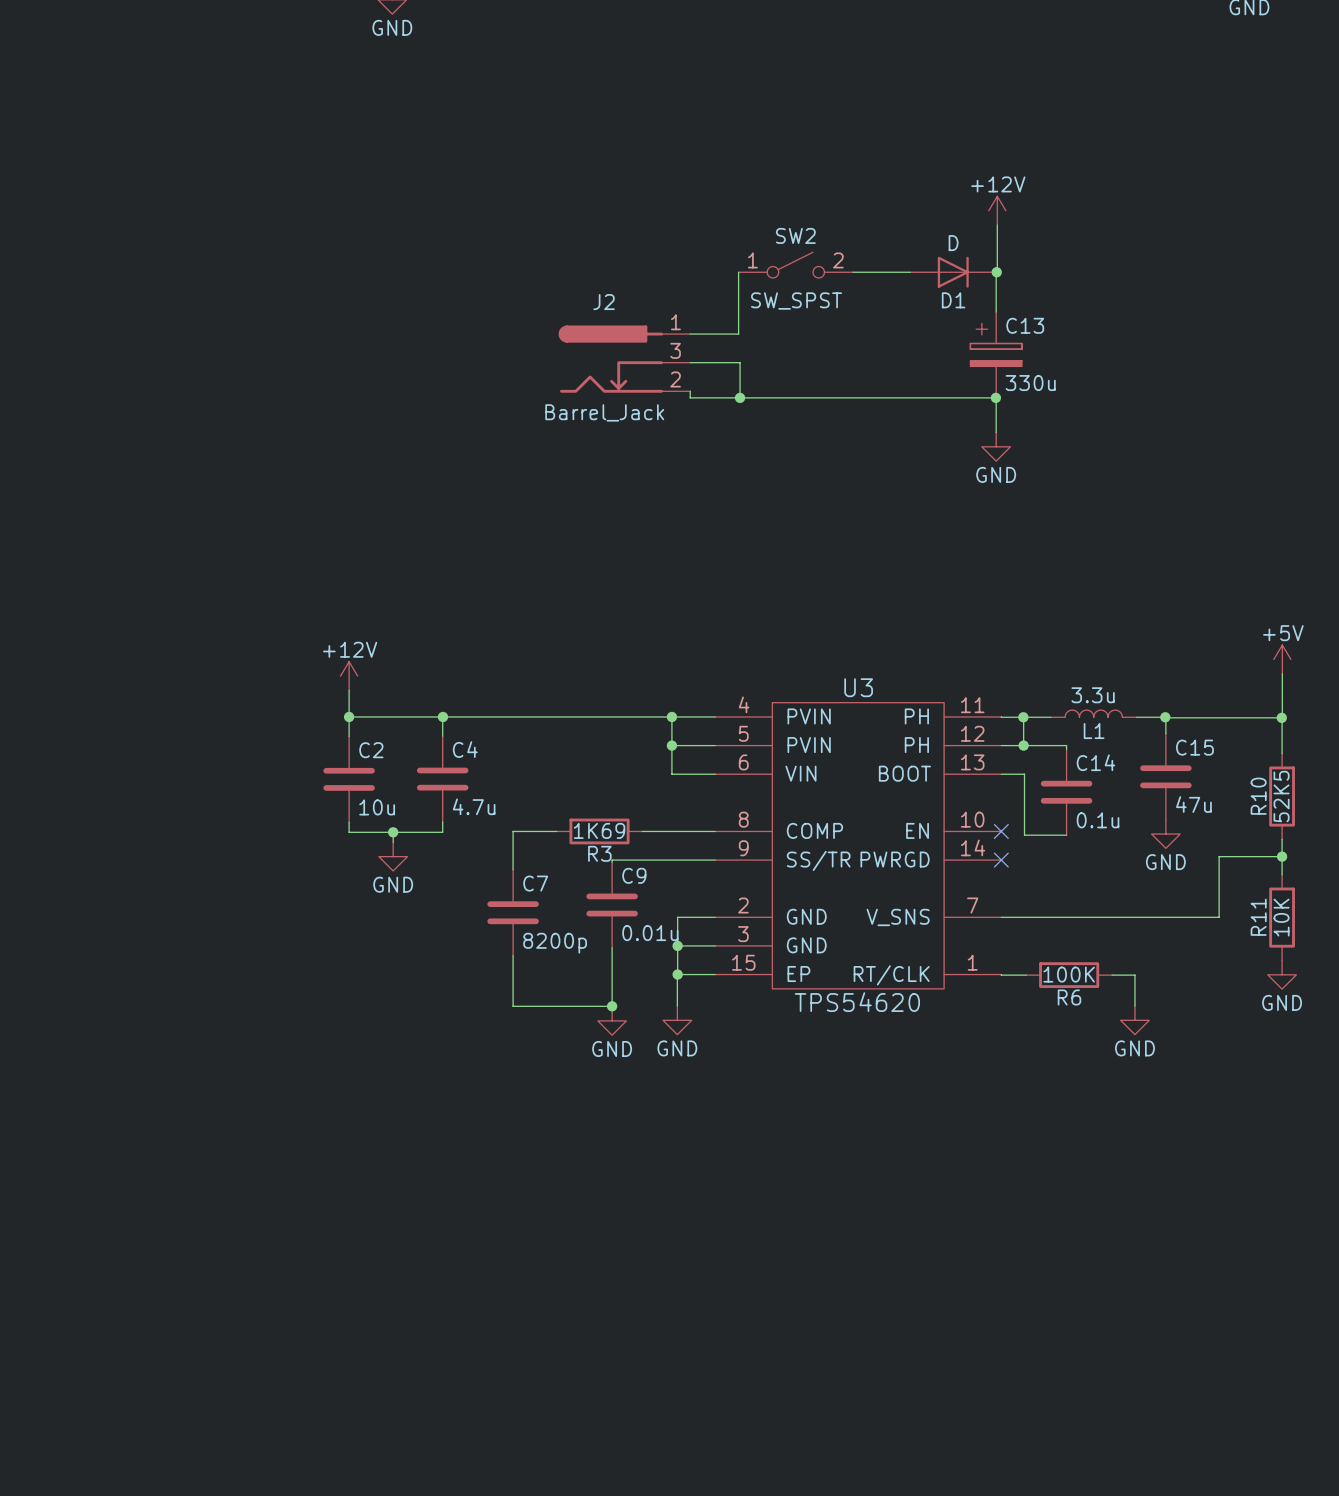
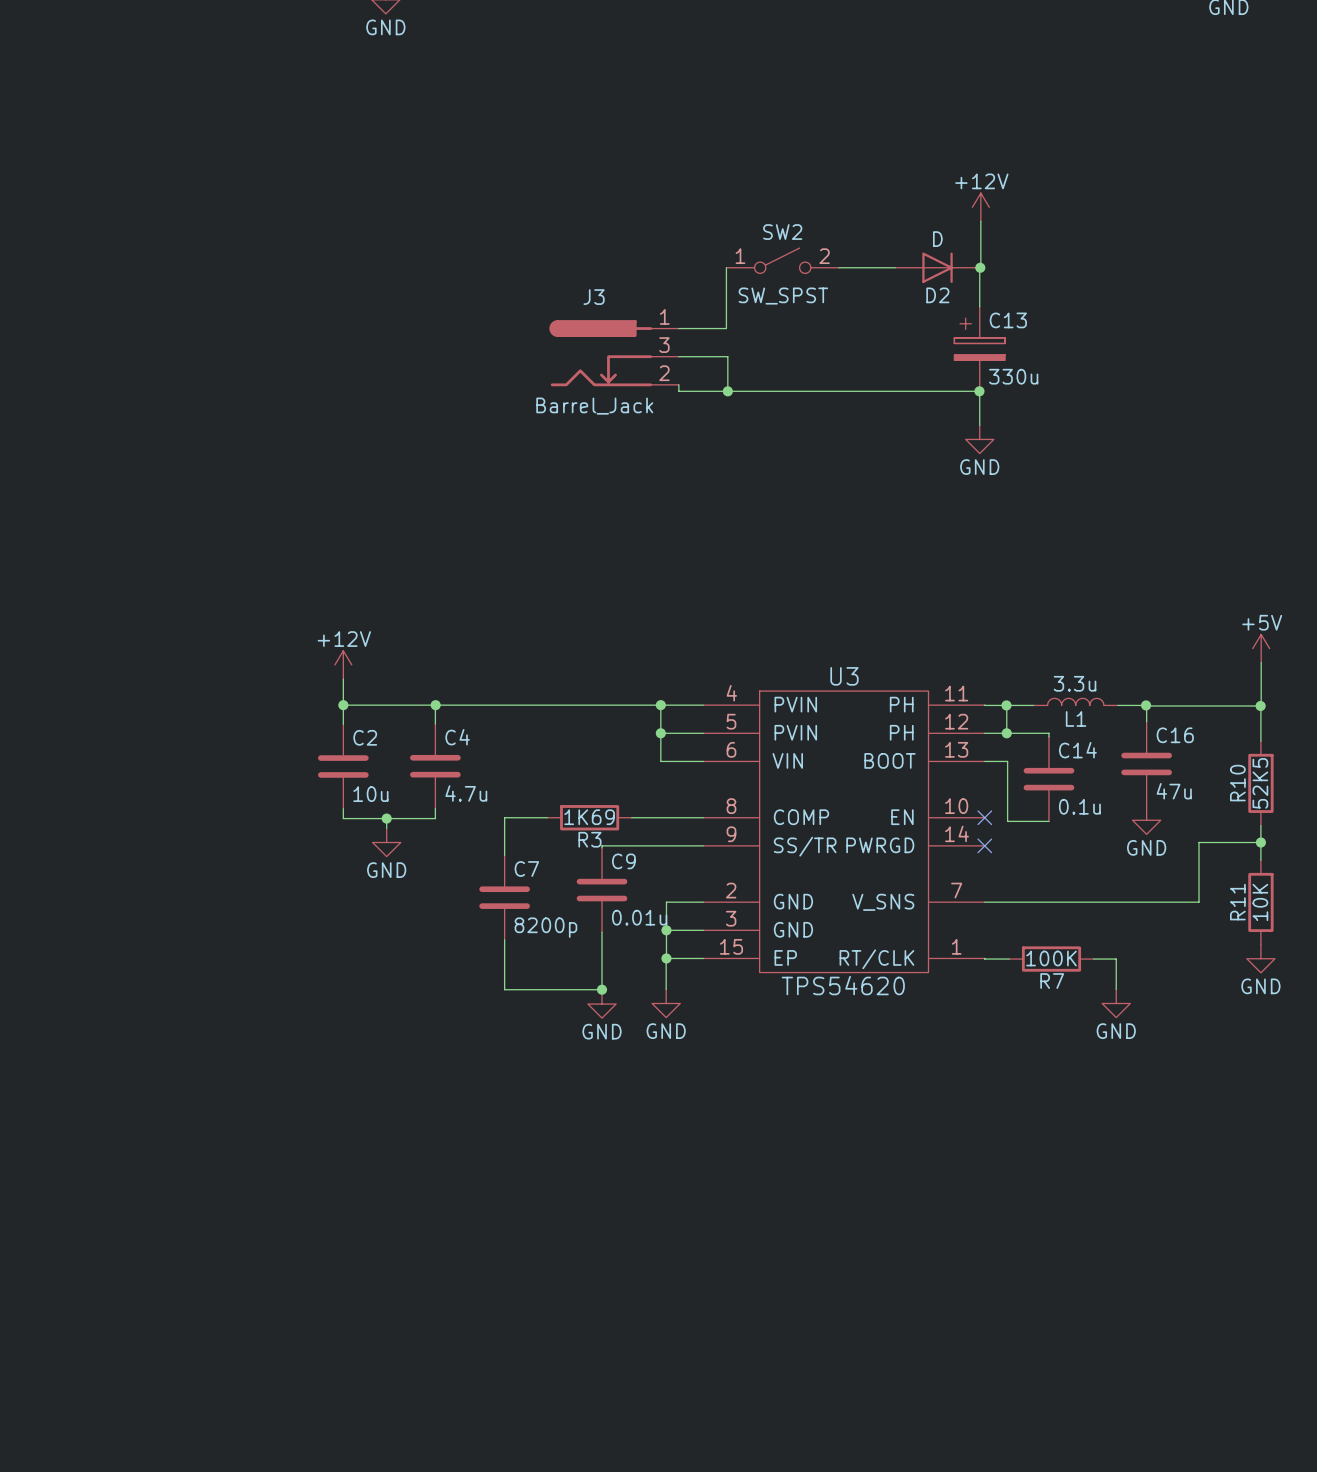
D1 name: D1 (953, 300) -> D2 (937, 295)
J2 name: J2 (604, 302) -> J3 (594, 297)
C15 name: C15 (1194, 747) -> C16 (1175, 735)
R6 name: R6 (1069, 997) -> R7 (1052, 981)

